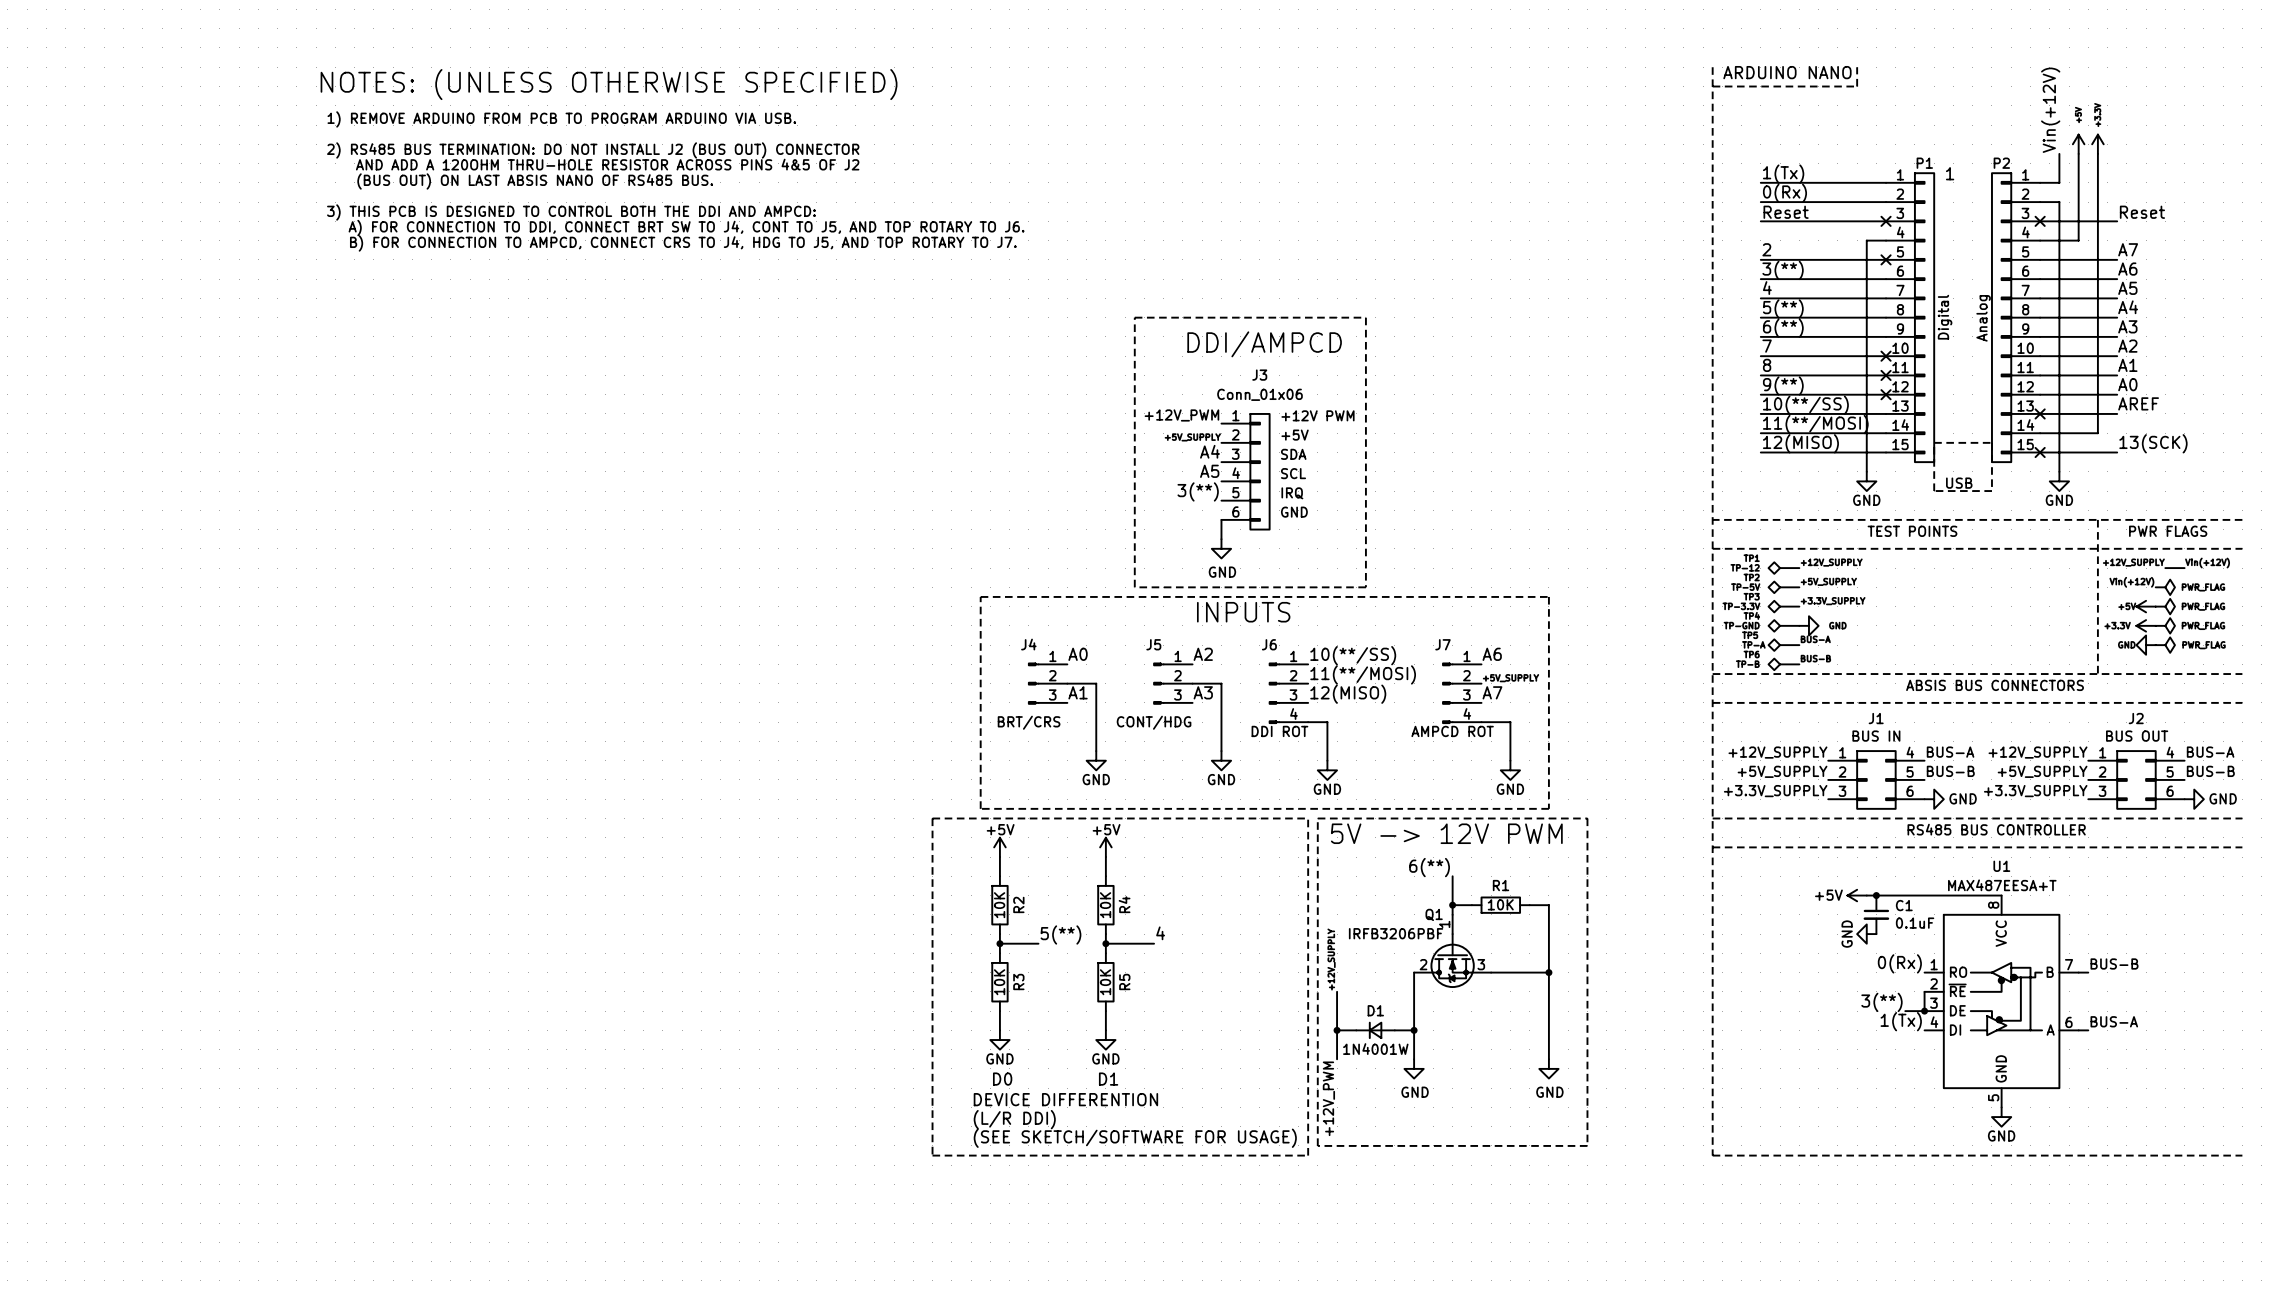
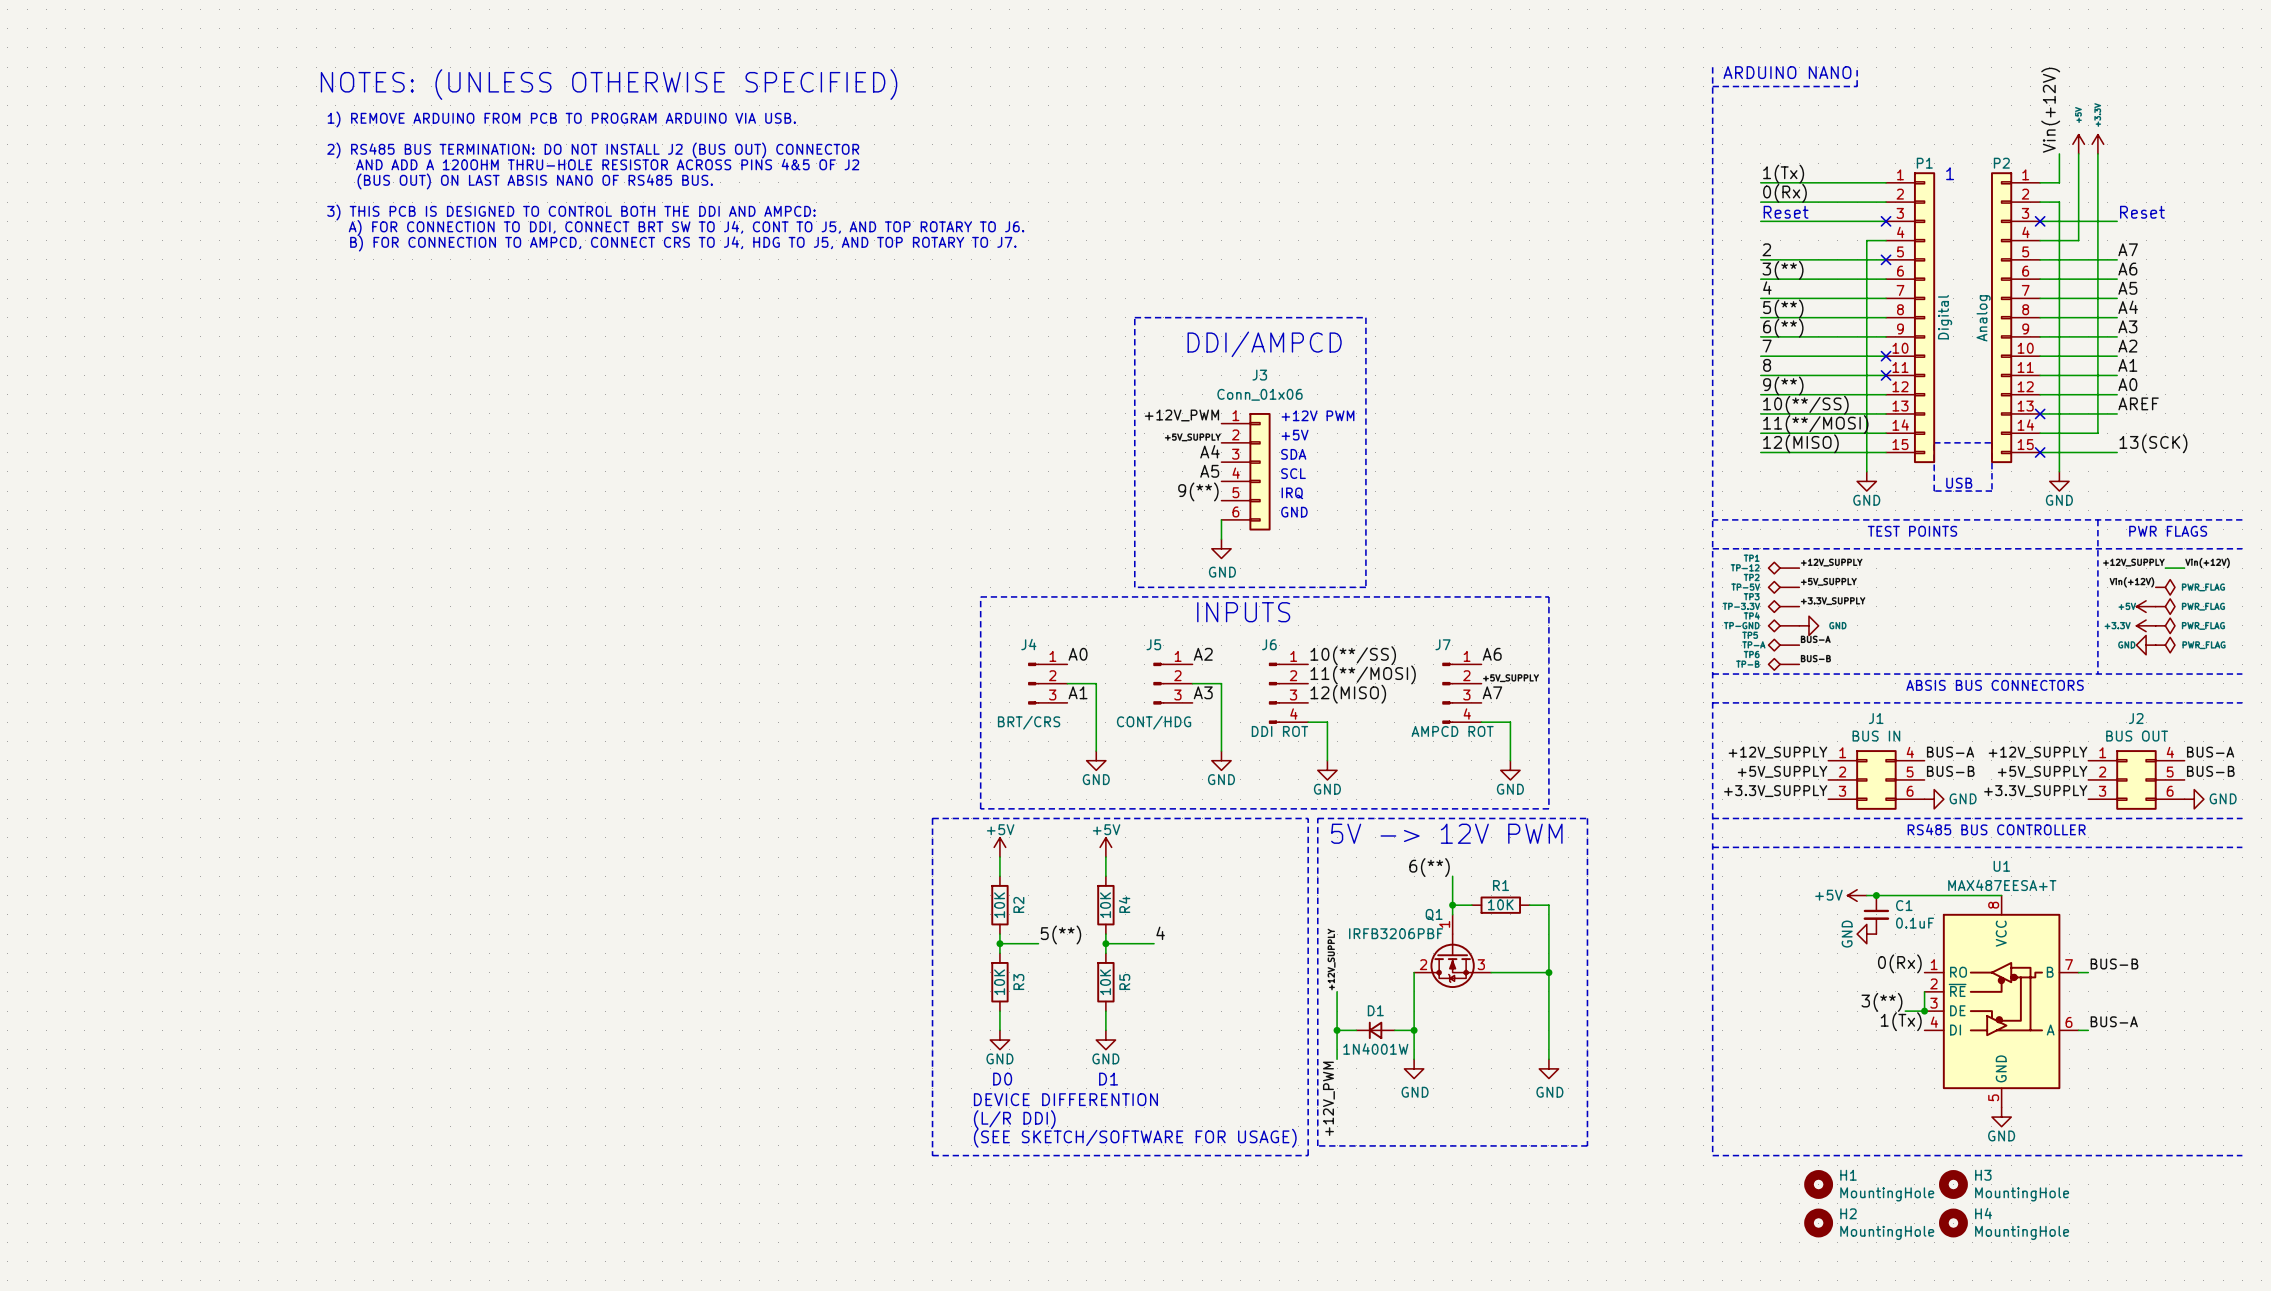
no-connect mark: (1886, 394) -> none
label: 3(**) (1198, 491) -> 9(**) (1198, 491)
H1: none -> MountingHole (1818, 1184)
H3: none -> MountingHole (1953, 1184)
H2: none -> MountingHole (1818, 1223)
H4: none -> MountingHole (1953, 1223)

